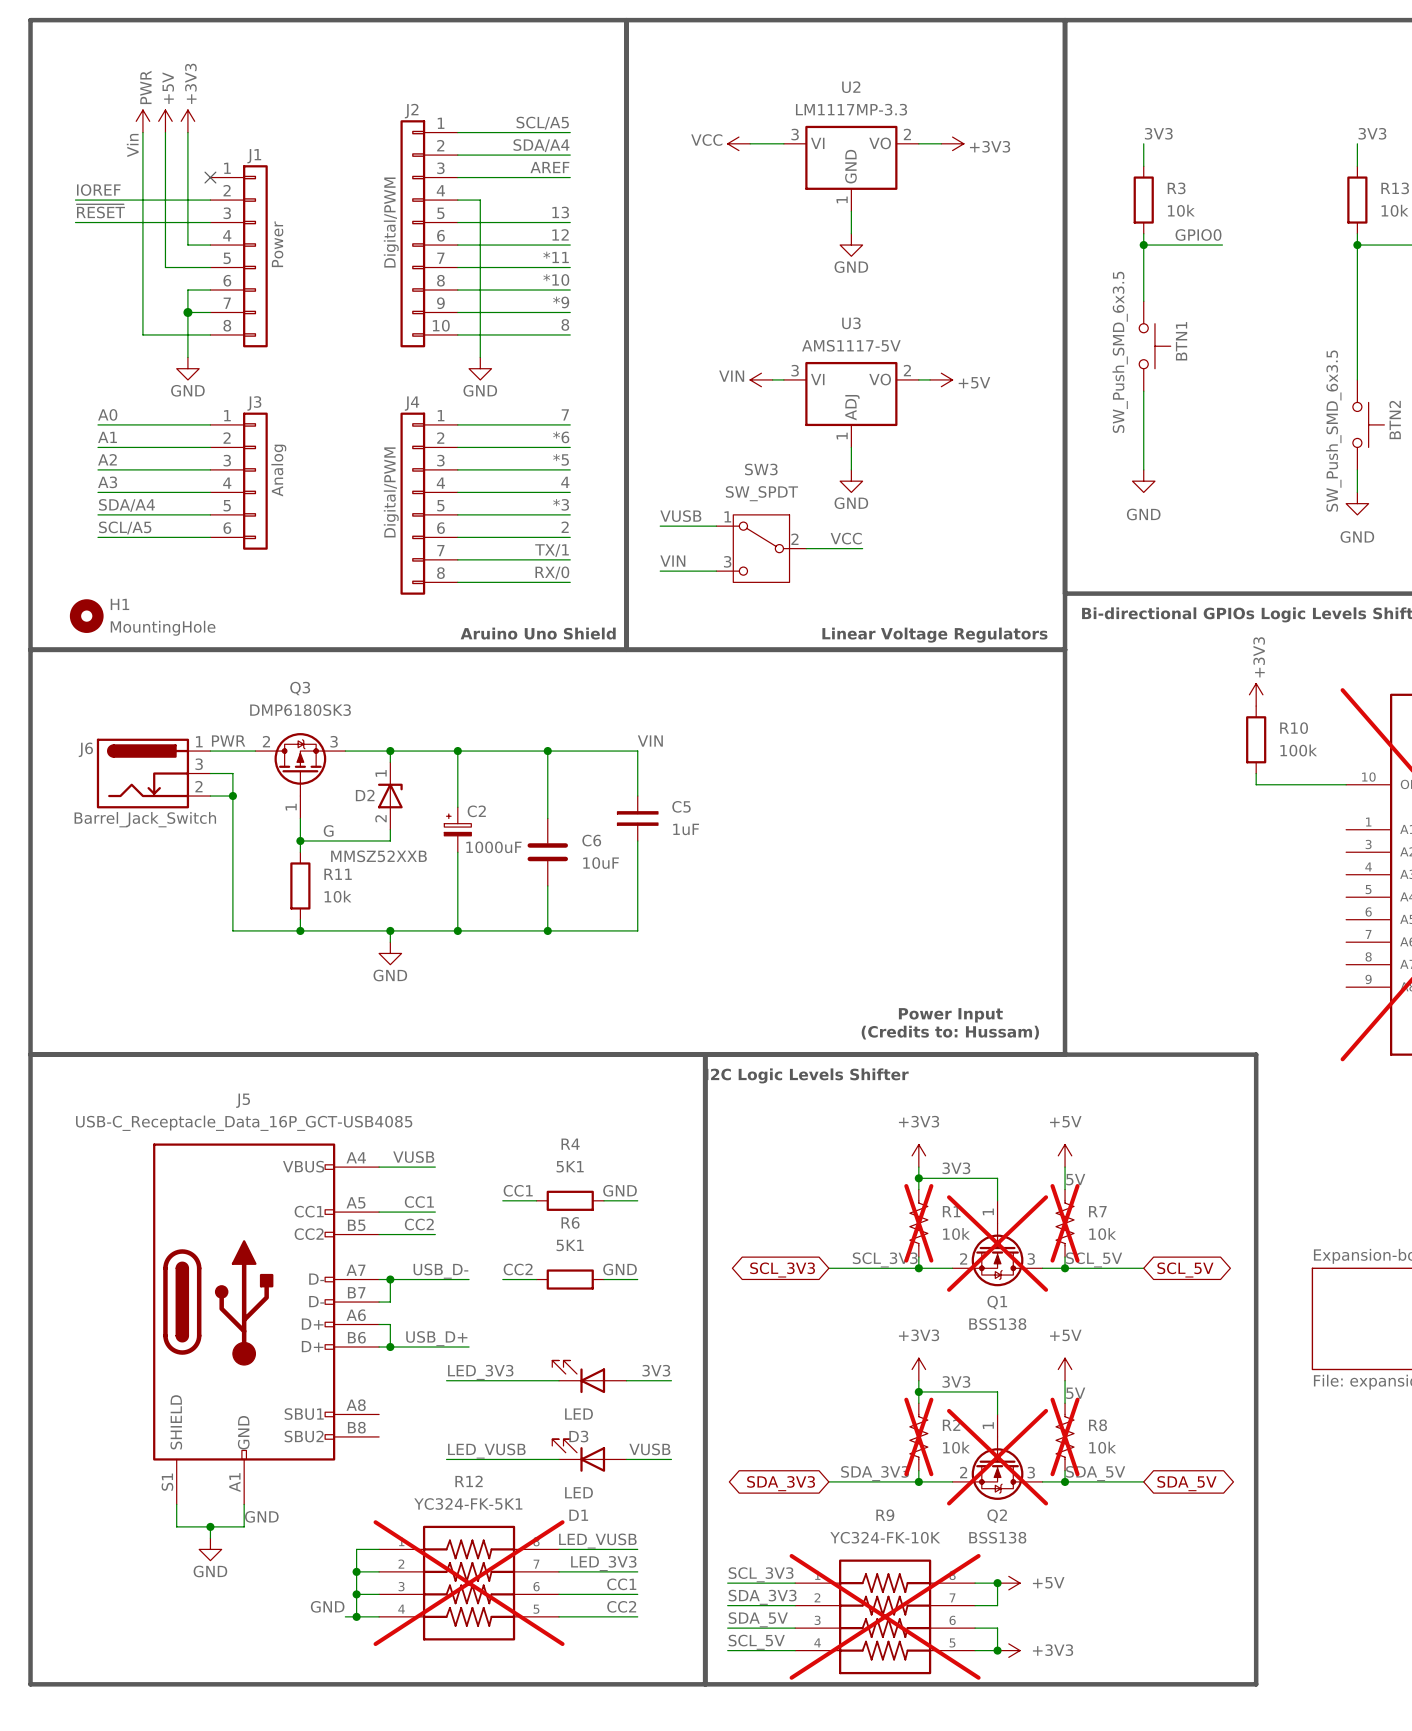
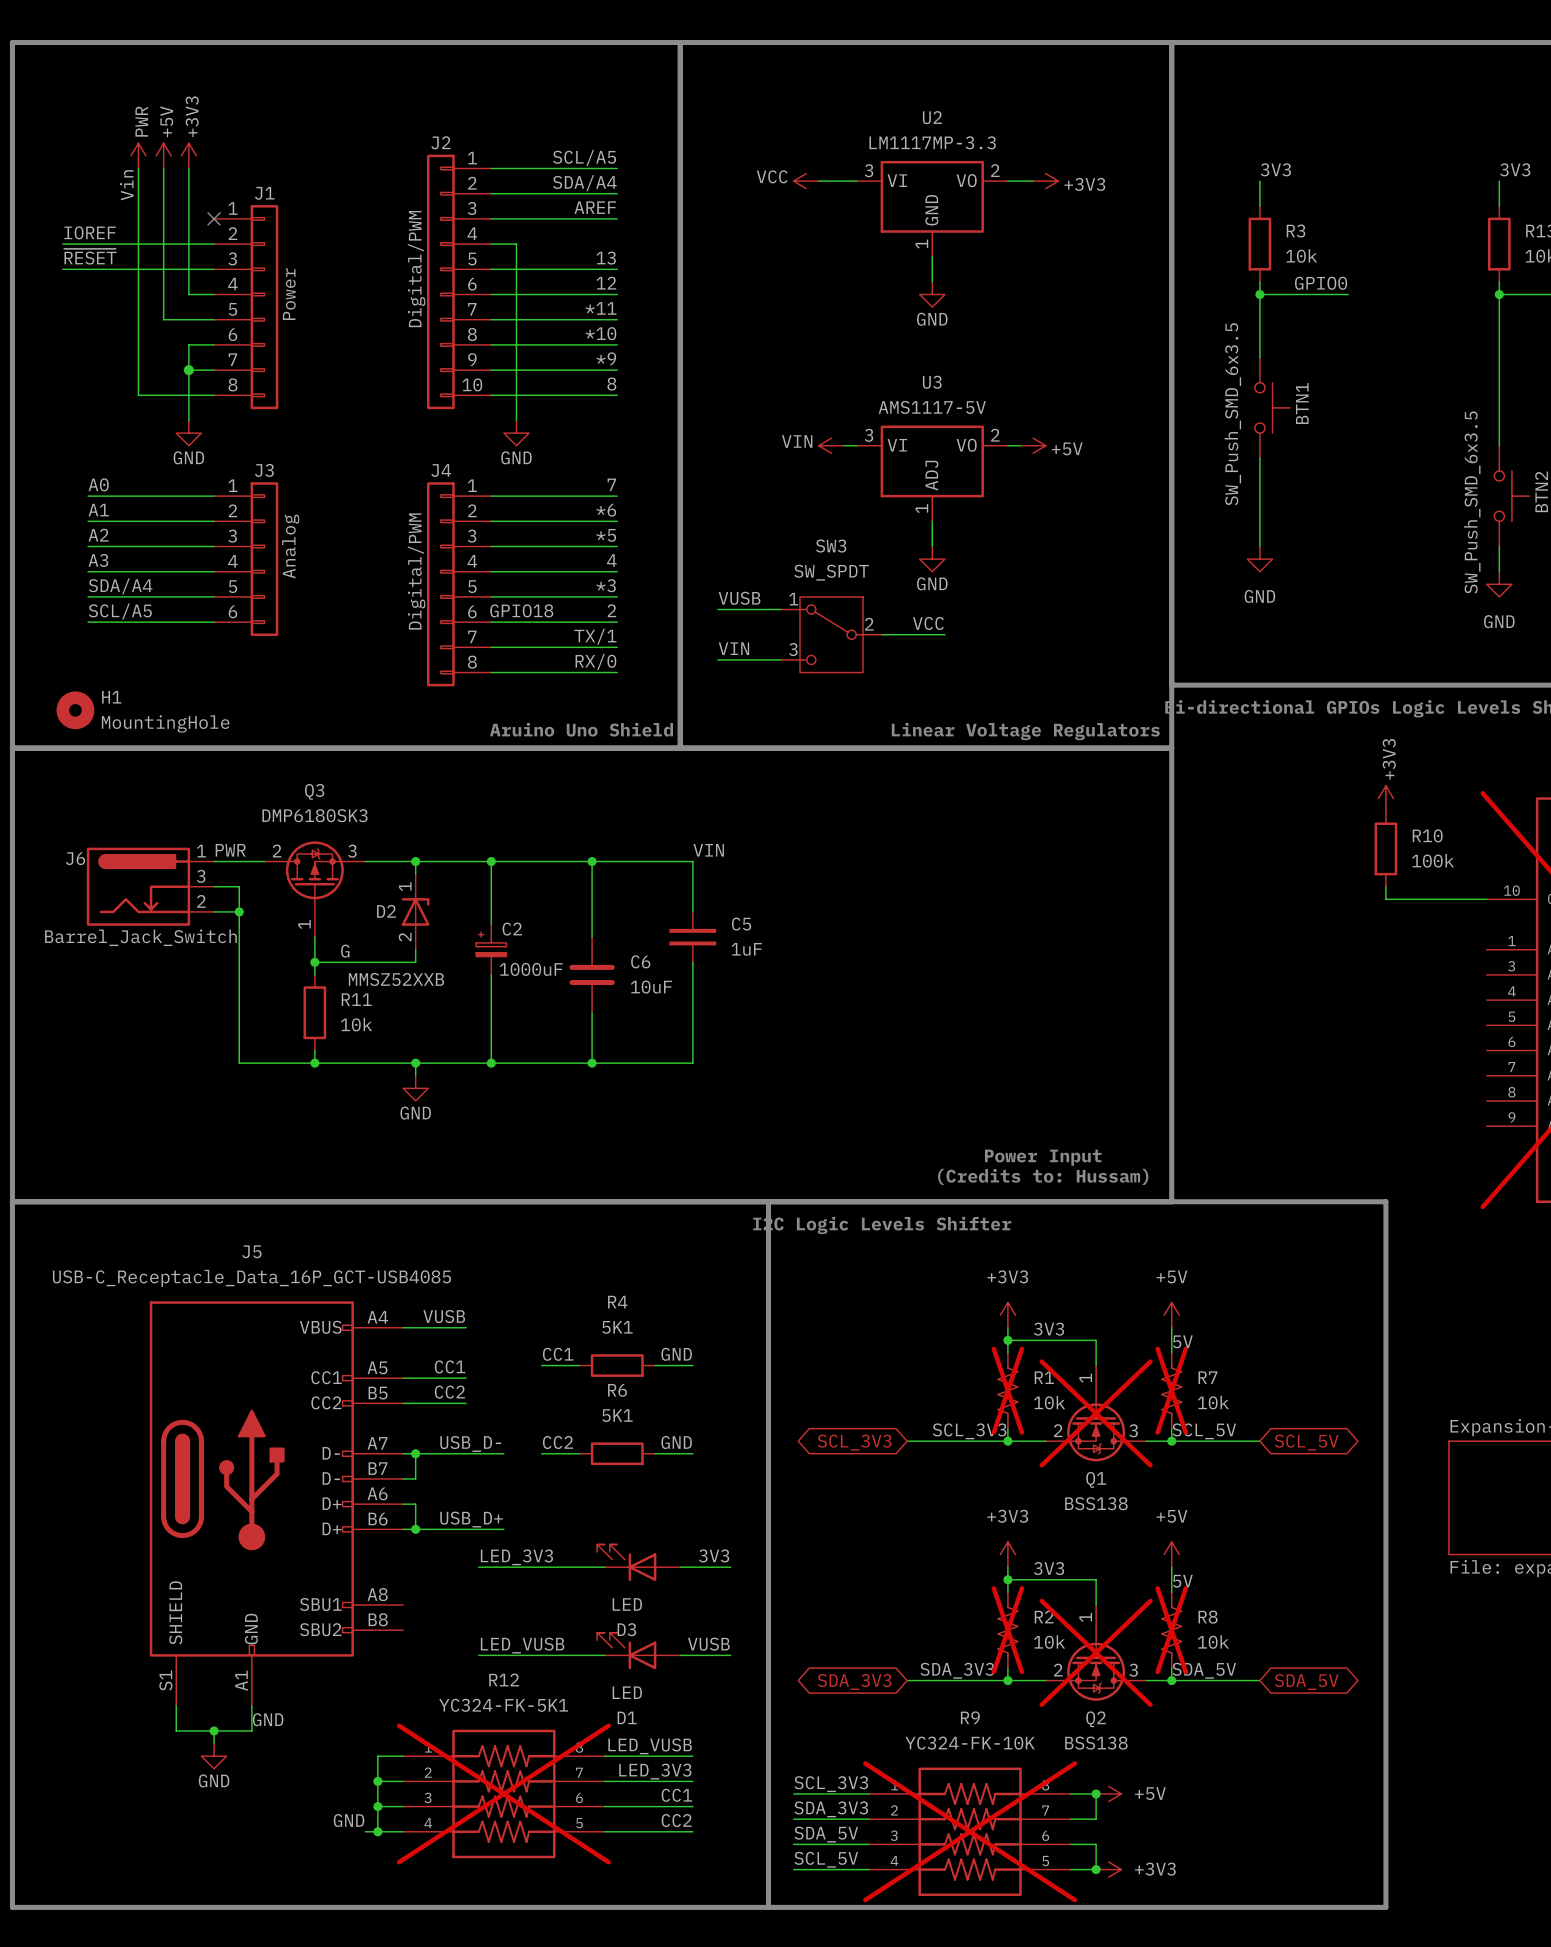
label: none -> GPIO18 (521, 610)

